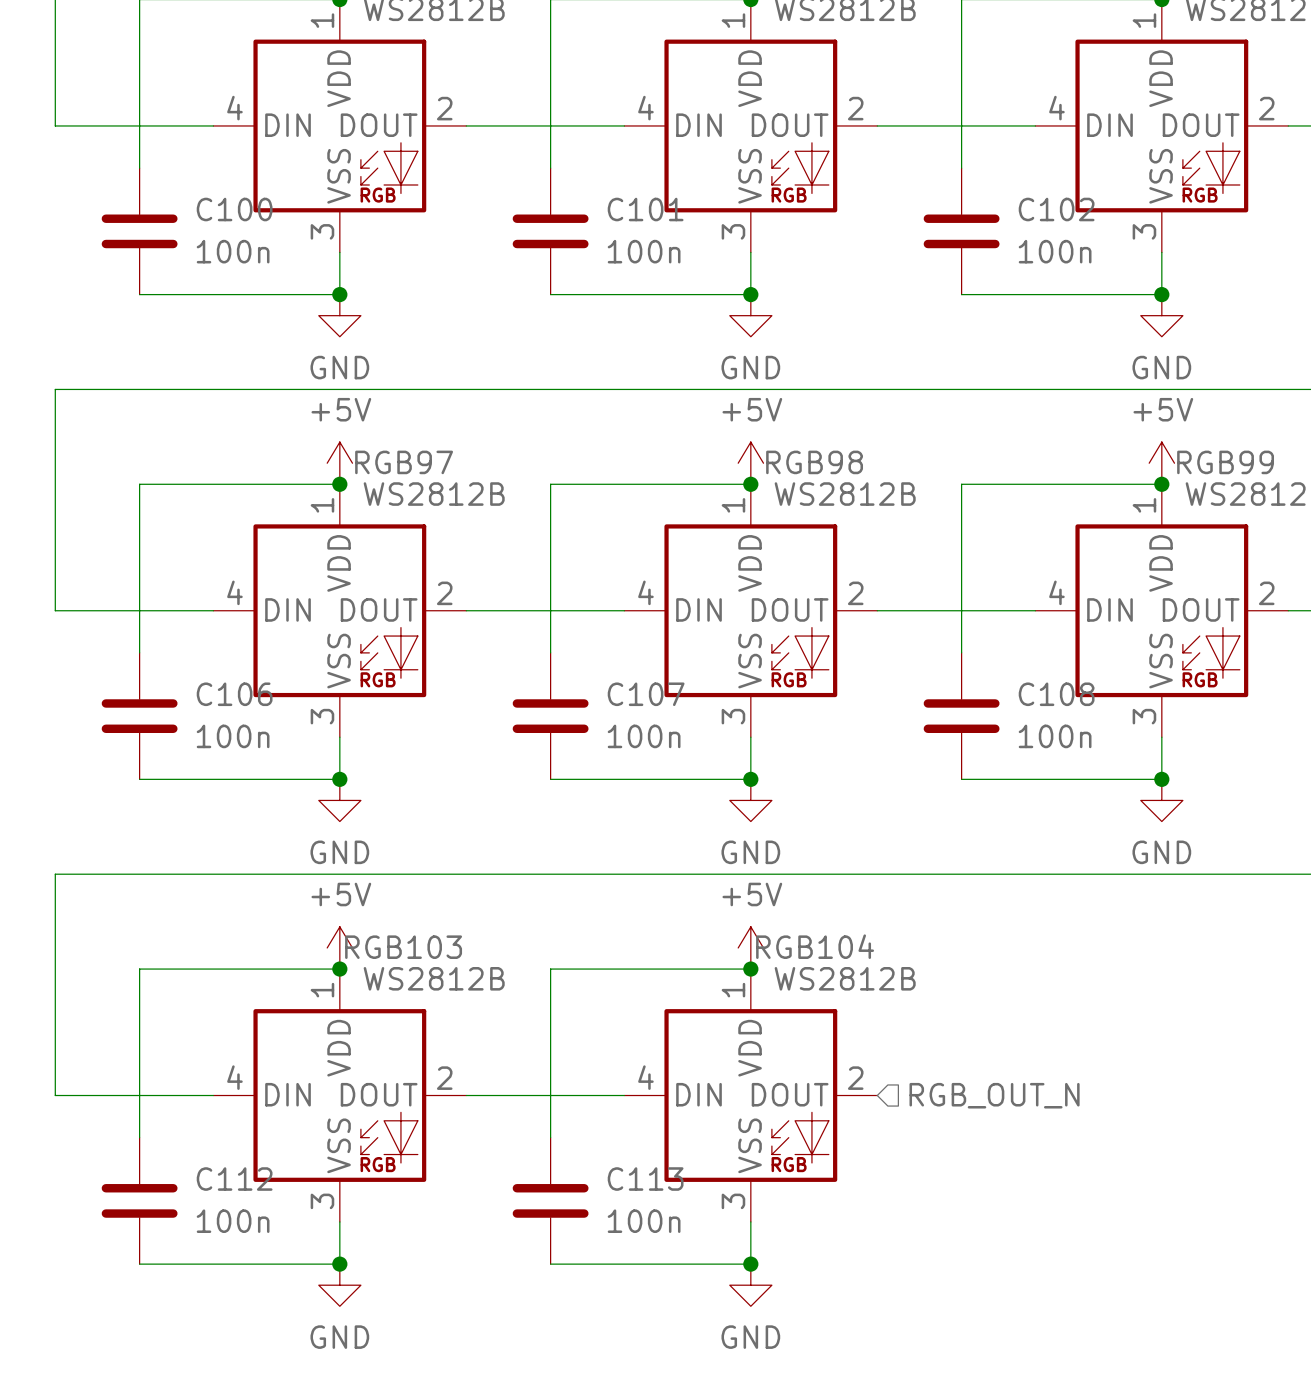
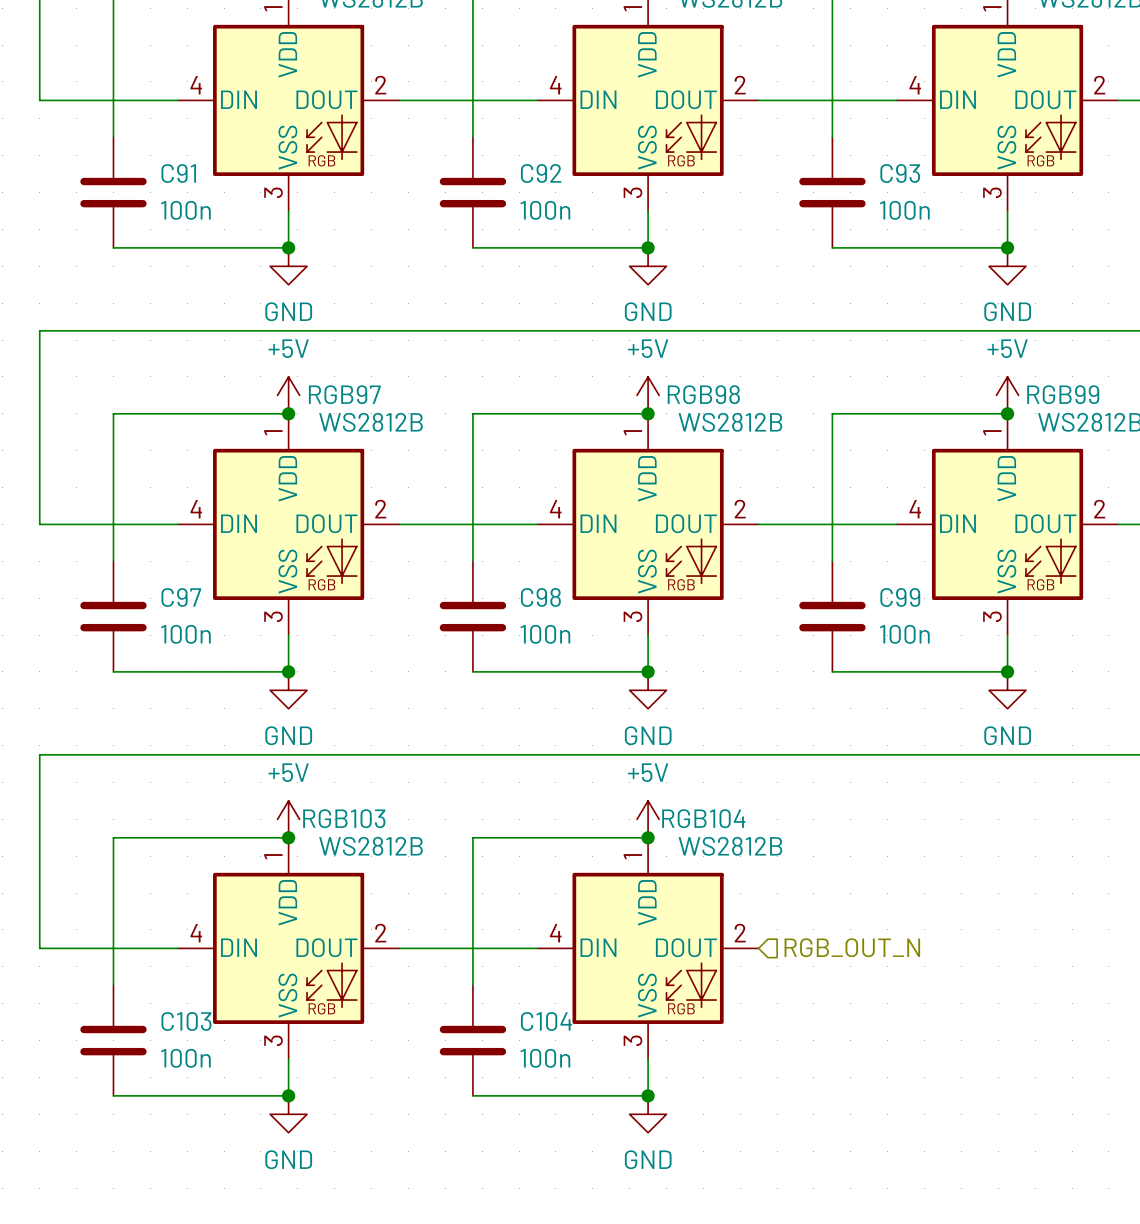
C100 name: C100 (234, 209) -> C91 (178, 173)
C101 name: C101 (645, 209) -> C92 (541, 173)
C102 name: C102 (1056, 209) -> C93 (900, 173)
C106 name: C106 (234, 694) -> C97 (181, 597)
C107 name: C107 (646, 694) -> C98 (540, 597)
C108 name: C108 (1056, 694) -> C99 (900, 597)
C112 name: C112 (234, 1179) -> C103 (186, 1021)
C113 name: C113 (645, 1179) -> C104 (546, 1021)

